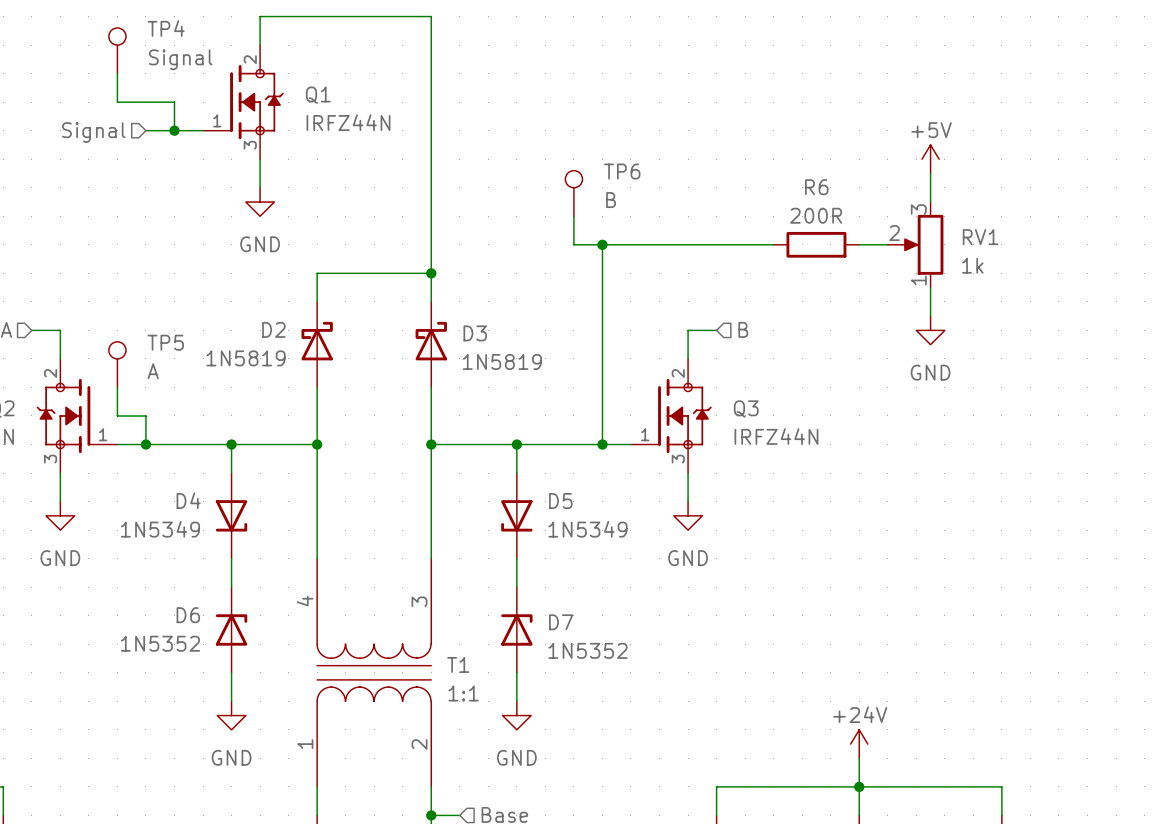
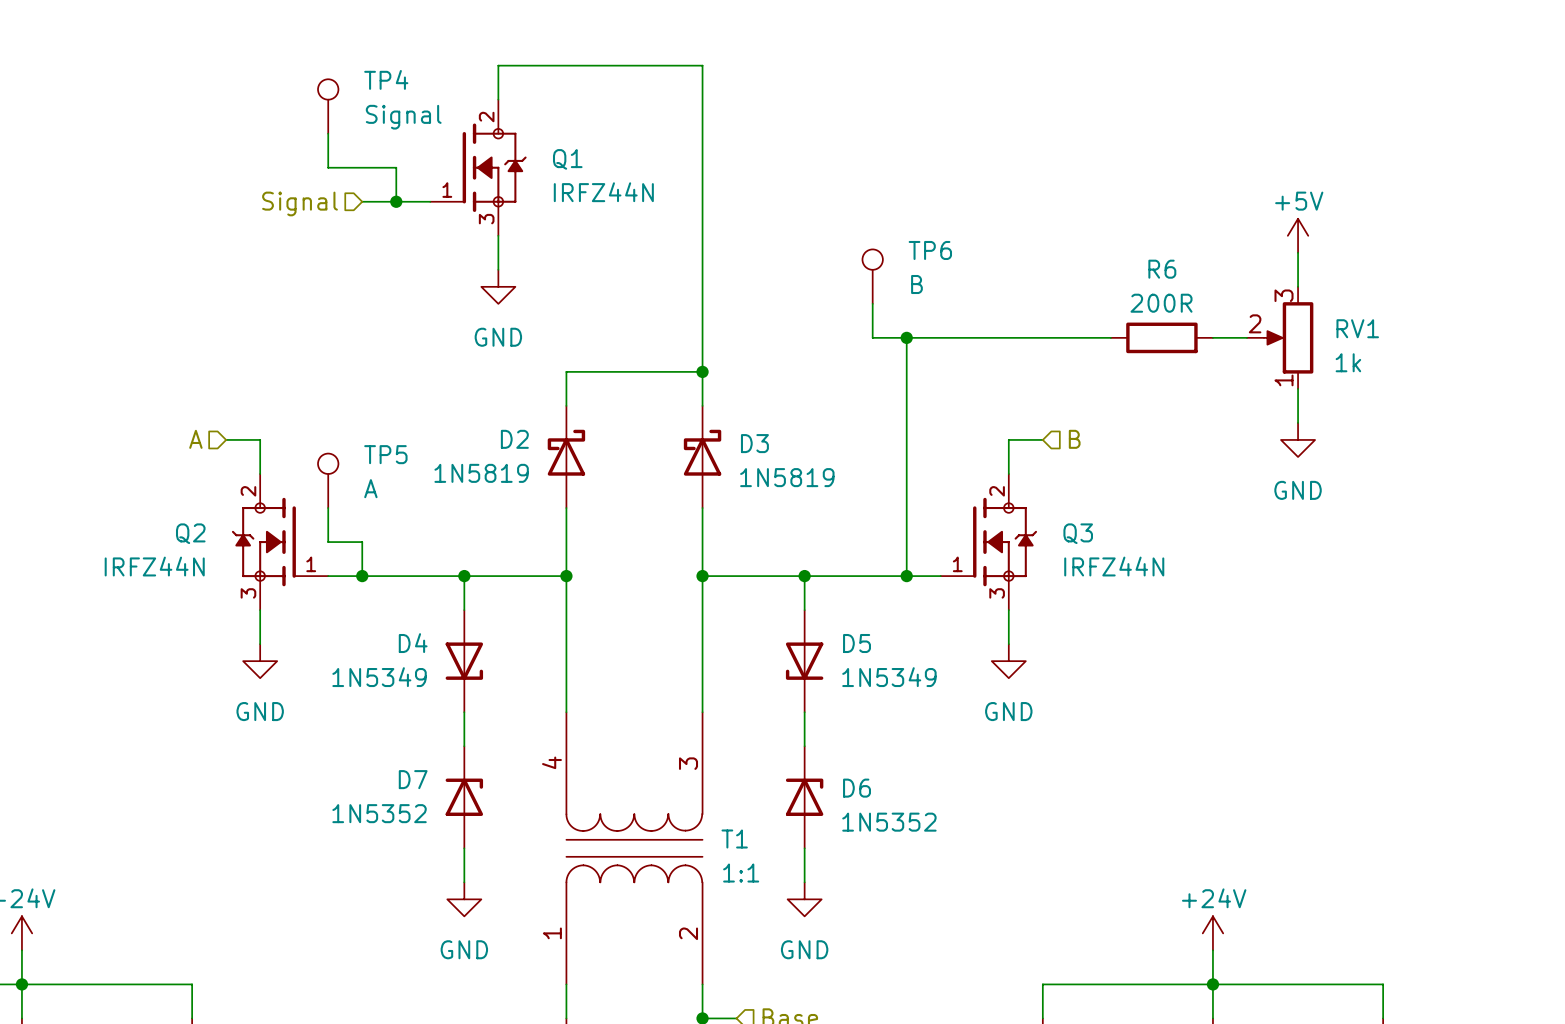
D6 name: D6 (188, 615) -> D7 (413, 779)
D7 name: D7 (561, 622) -> D6 (857, 788)

